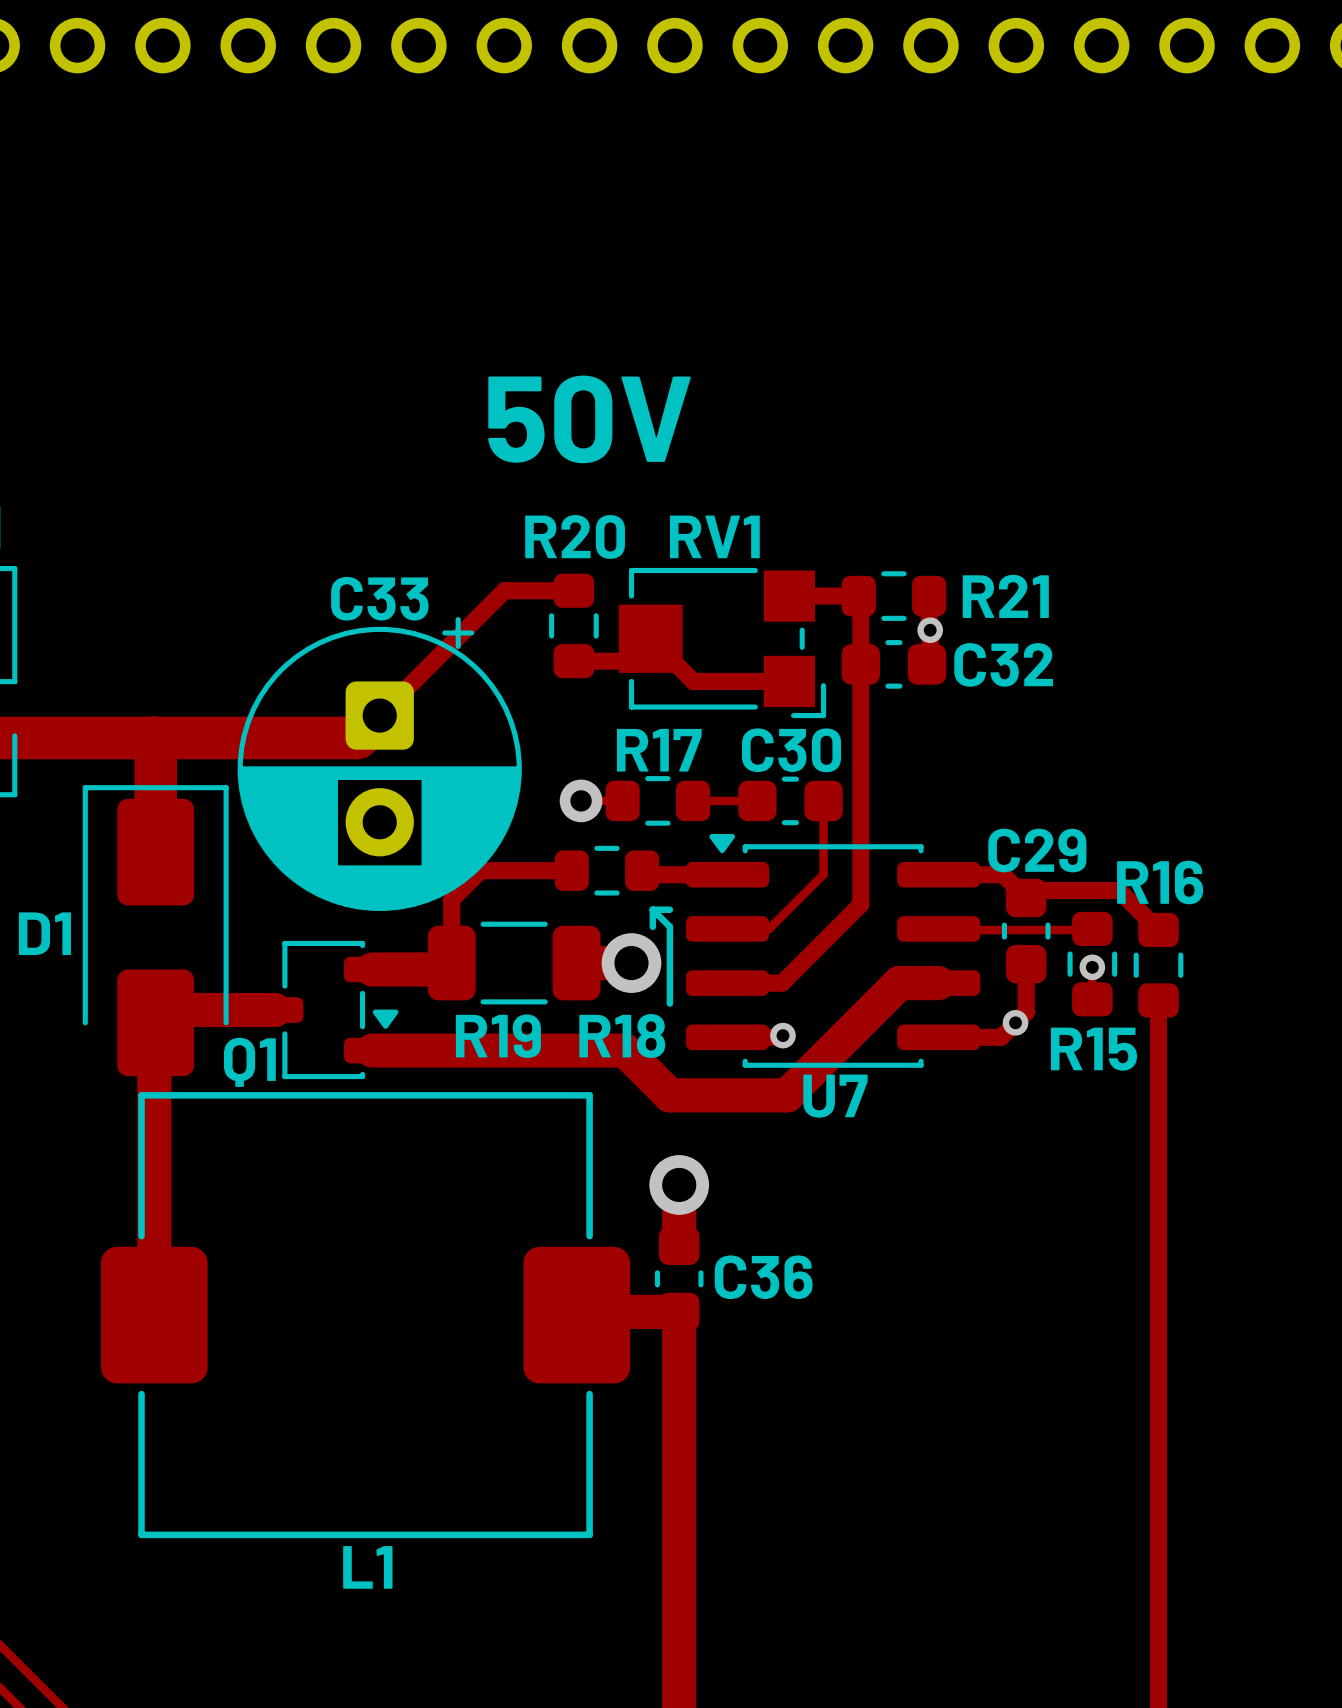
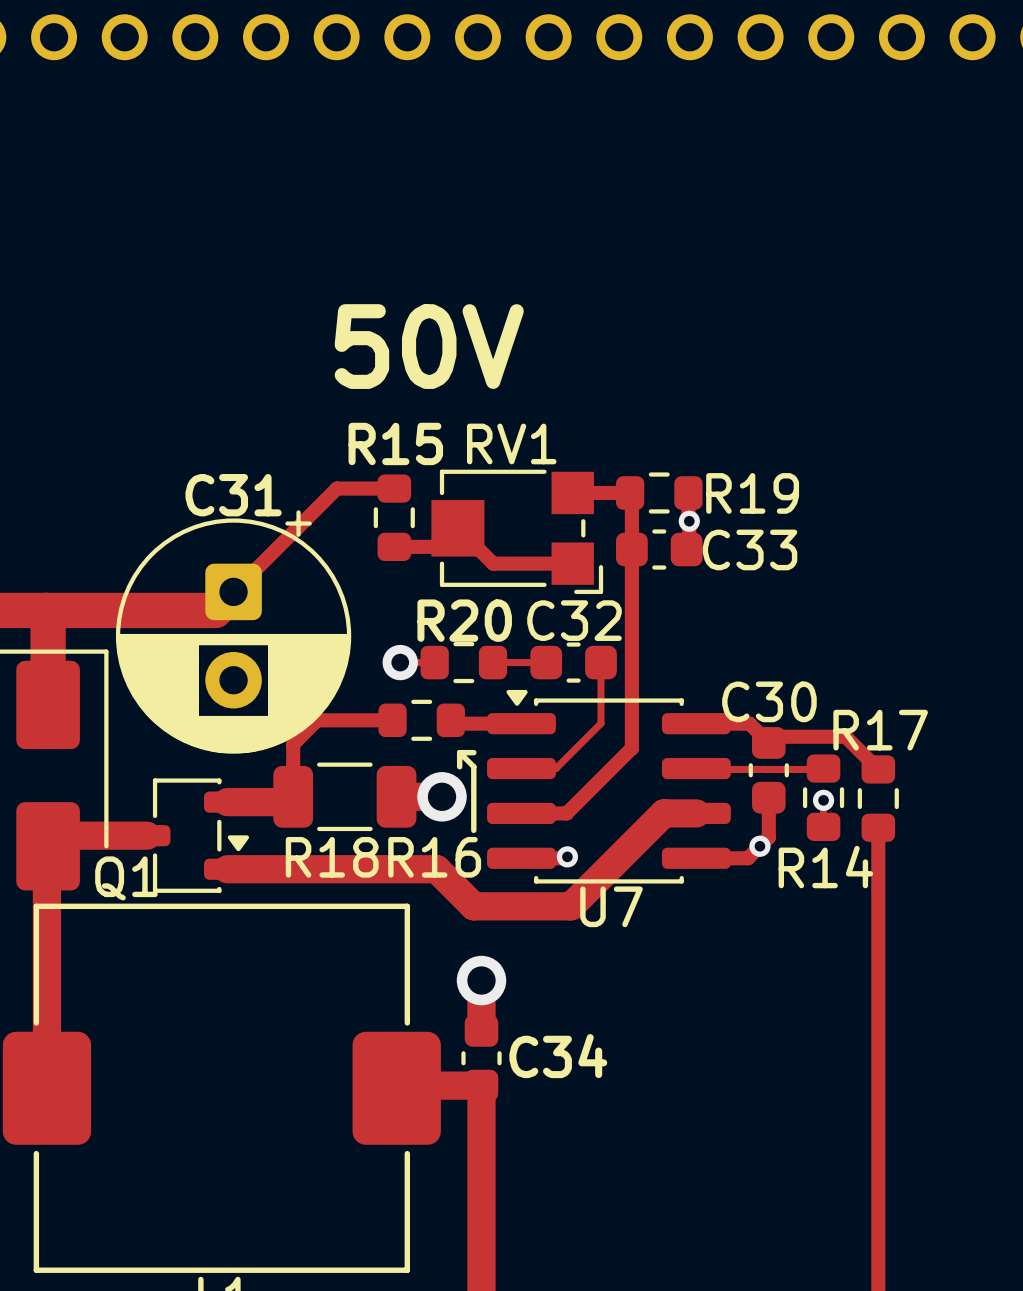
R20 name: R20 (575, 536) -> R15 (395, 443)
R21 name: R21 (1005, 596) -> R19 (752, 493)
C33 name: C33 (379, 598) -> C31 (233, 495)
C32 name: C32 (1003, 664) -> C33 (750, 549)
R17 name: R17 (659, 750) -> R20 (464, 620)
C30 name: C30 (791, 750) -> C32 (574, 620)
C29 name: C29 (1037, 850) -> C30 (769, 701)
R16 name: R16 (1160, 882) -> R17 (880, 730)
R18 name: R18 (622, 1035) -> R16 (434, 857)
R19 name: R19 (498, 1036) -> R18 (332, 857)
R15 name: R15 (1093, 1049) -> R14 (825, 867)
C36 name: C36 (763, 1277) -> C34 (558, 1056)

